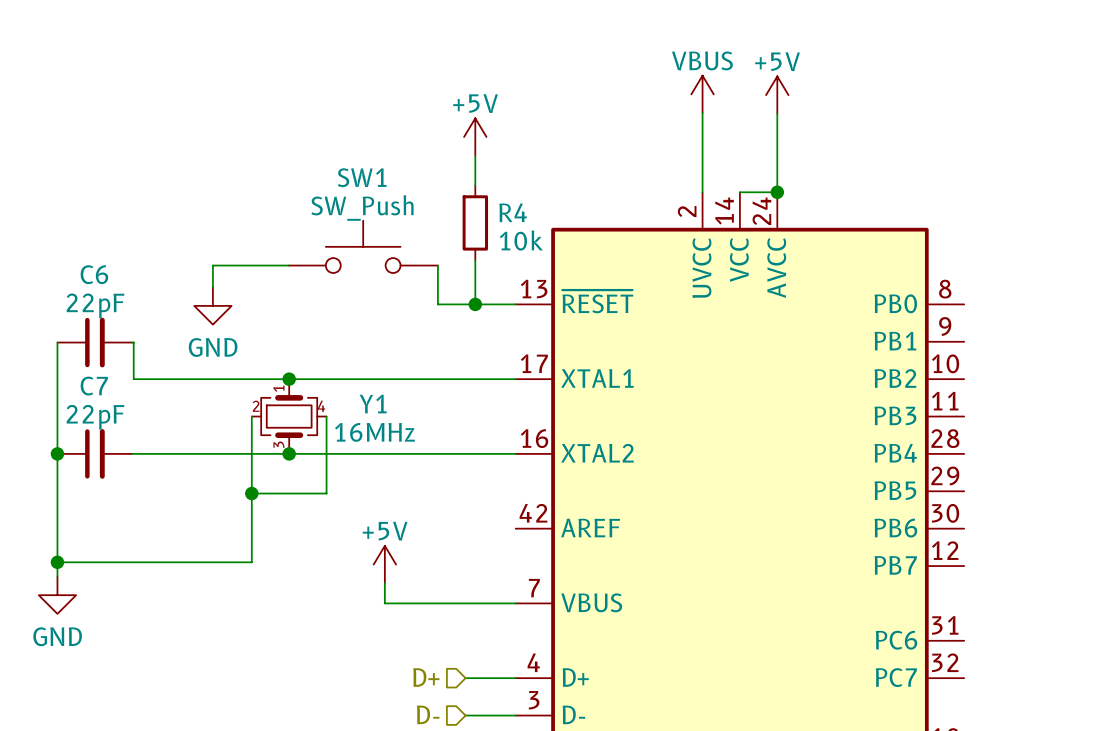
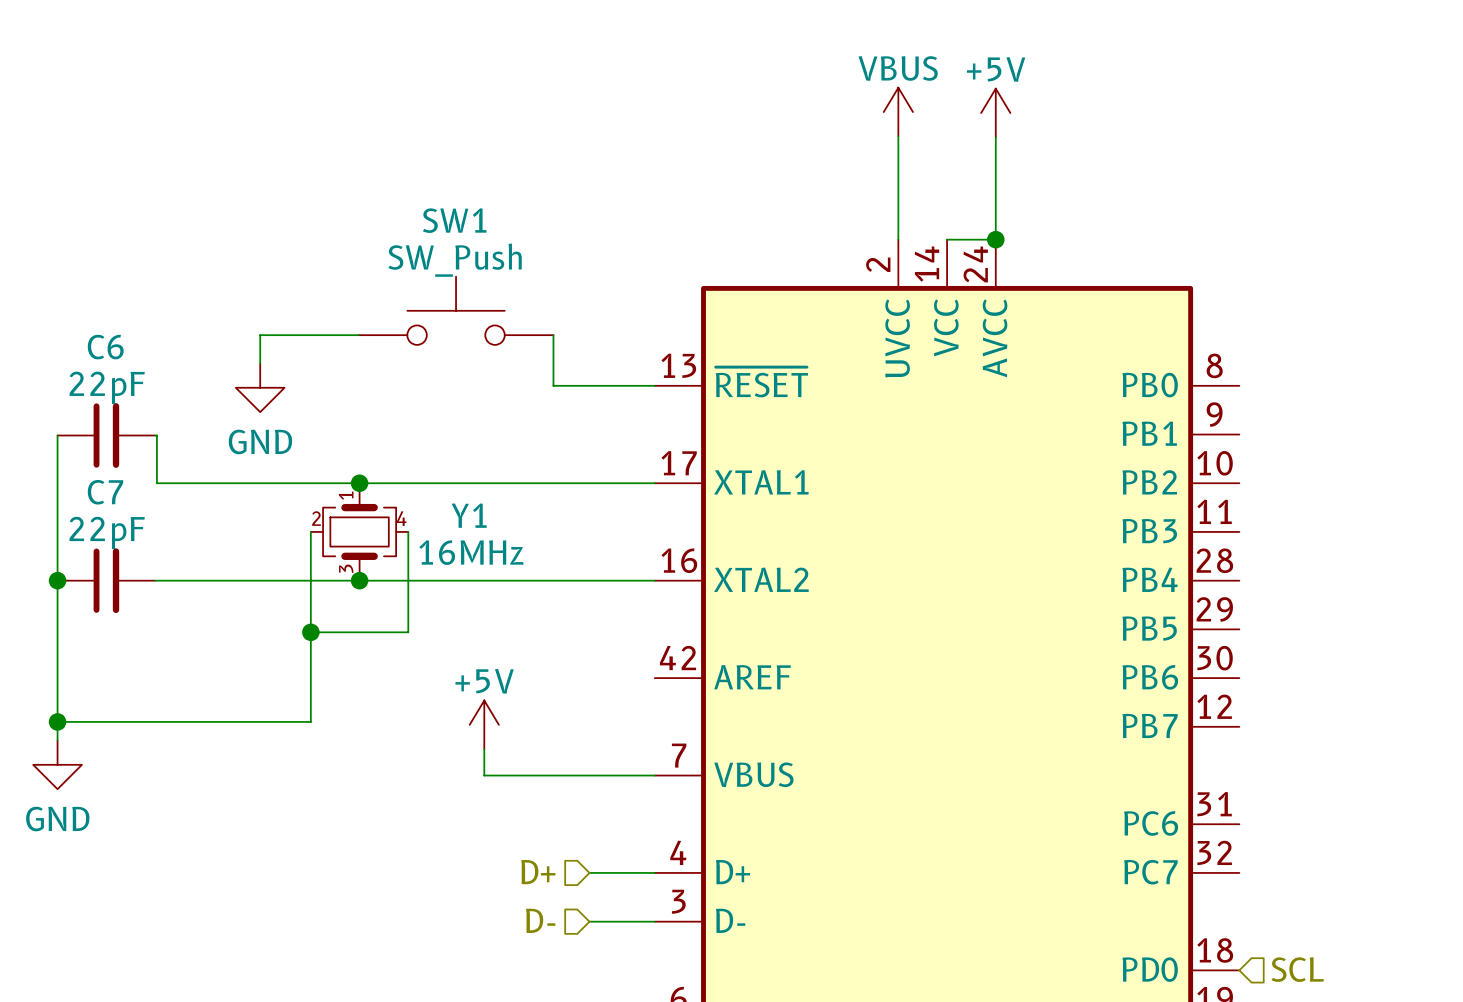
power symbol: +5V (475, 136) -> none
wire: (475, 155) (475, 185) -> none
R4: 10k (475, 222) -> none
wire: (475, 260) (475, 304) -> none
junction: (475, 304) -> none

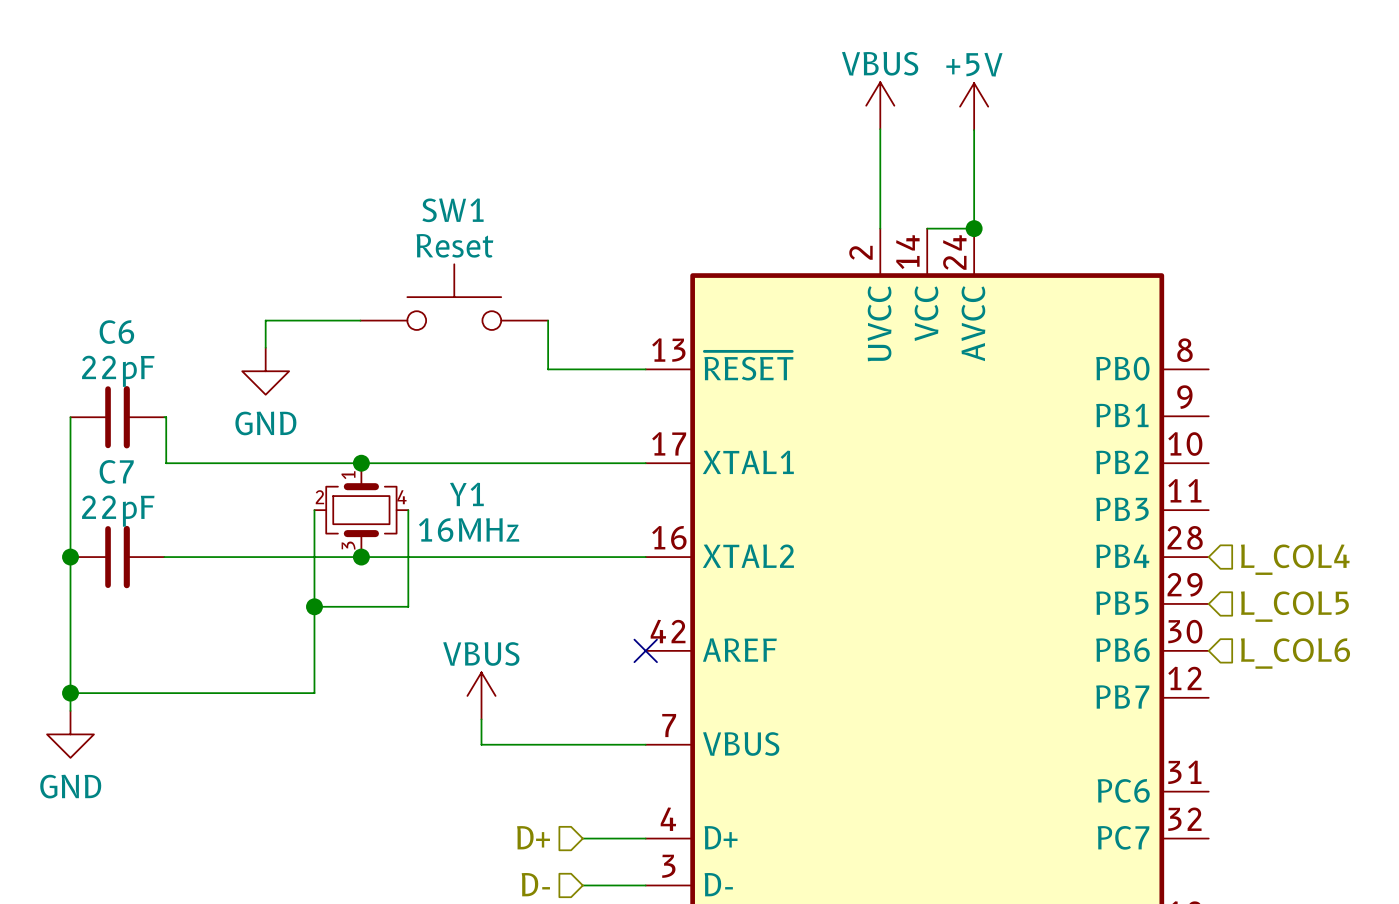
SW1 value: SW_Push (455, 260) -> Reset (454, 245)
hierarchical label: none -> L_COL4 (1295, 559)
hierarchical label: none -> L_COL5 (1294, 606)
no-connect mark: none -> (645, 650)
hierarchical label: none -> L_COL6 (1295, 653)
power symbol: +5V (484, 724) -> VBUS (481, 695)

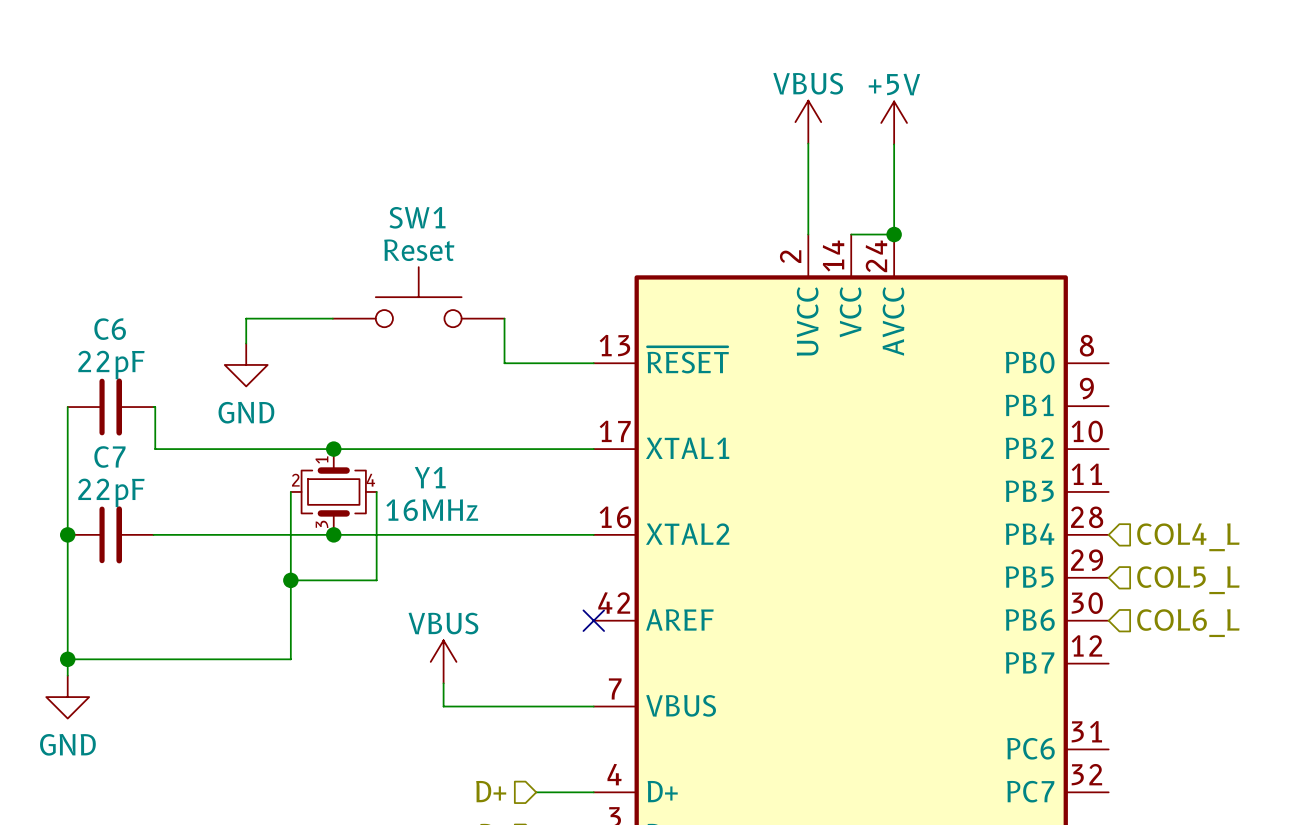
hierarchical label: L_COL4 (1295, 559) -> COL4_L (1188, 537)
hierarchical label: L_COL5 (1294, 606) -> COL5_L (1188, 580)
hierarchical label: L_COL6 (1295, 653) -> COL6_L (1188, 623)

